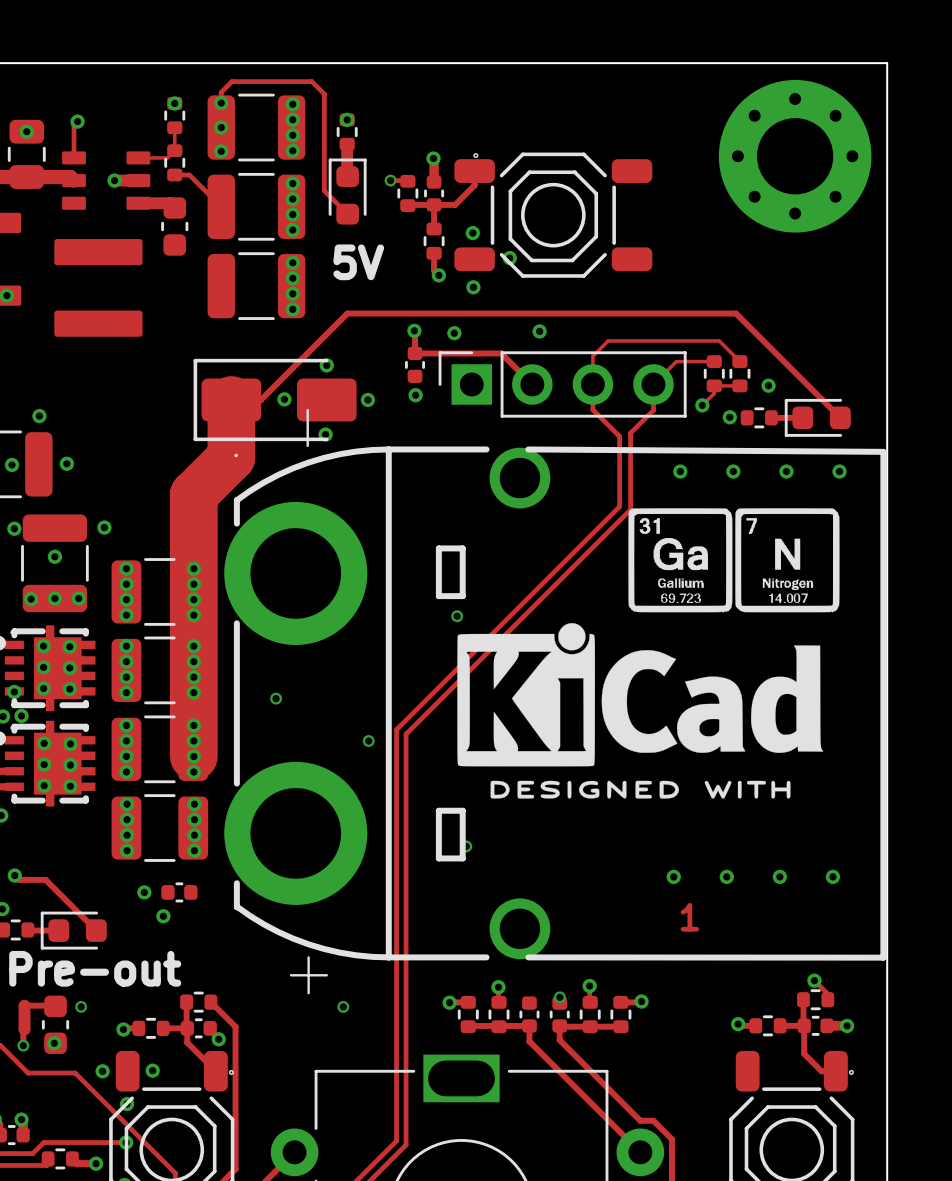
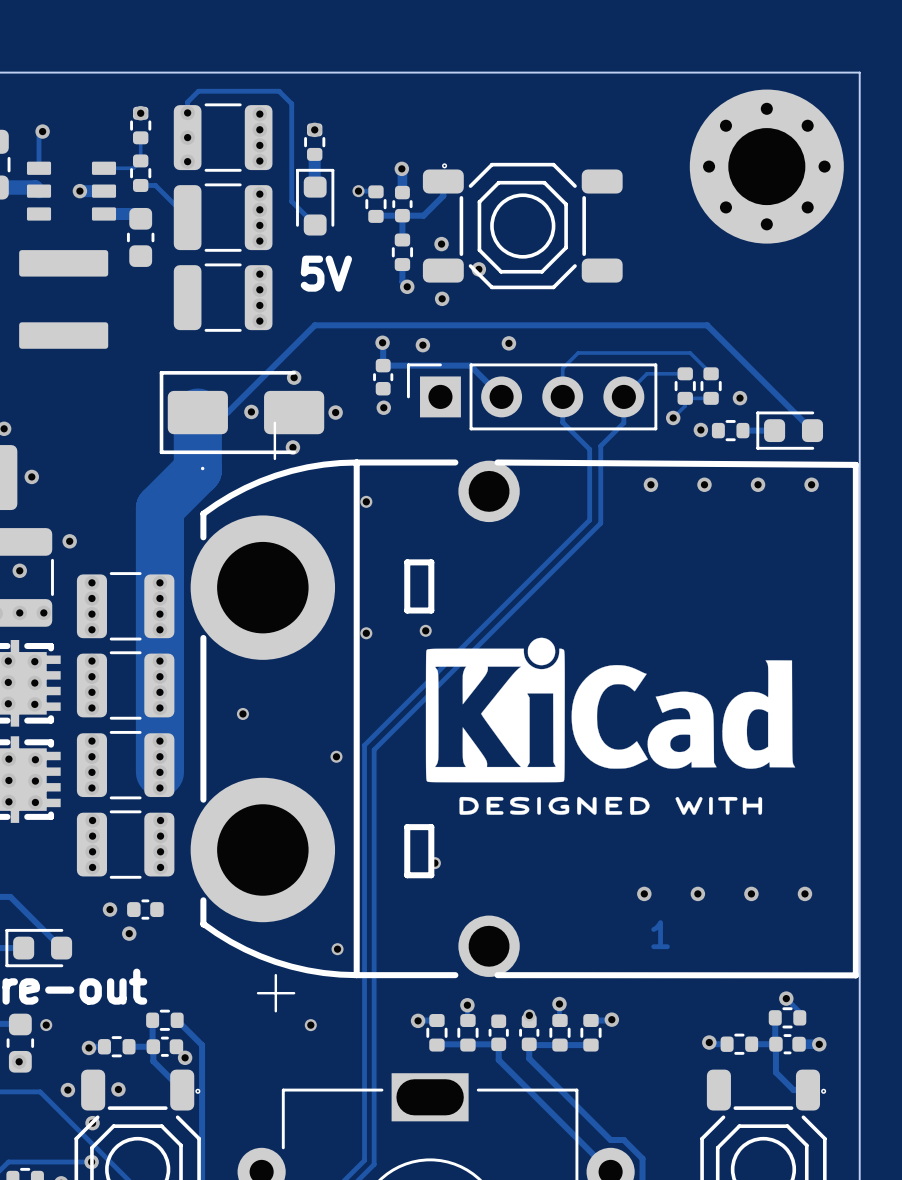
via: none -> (366, 501)
drawing: [628, 508, 840, 613] -> none
via: none -> (366, 633)
via: none -> (337, 949)

